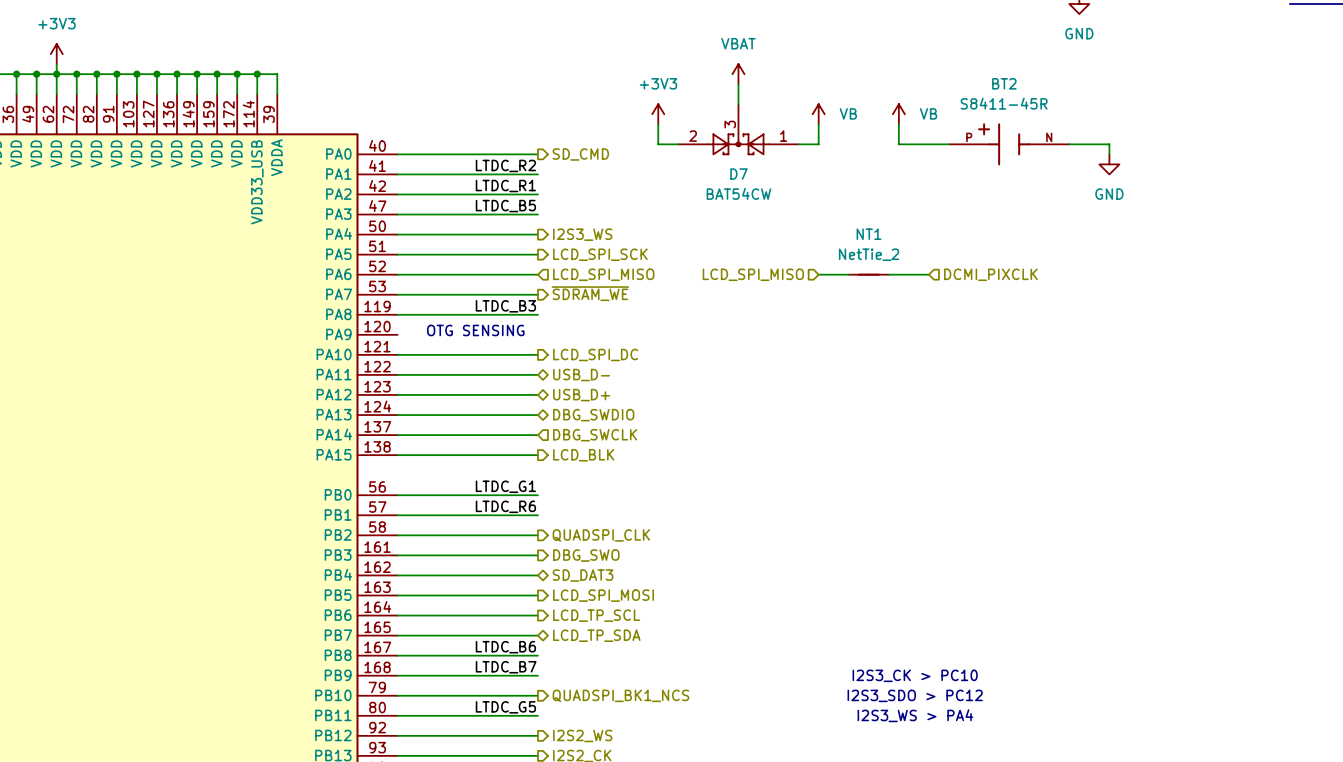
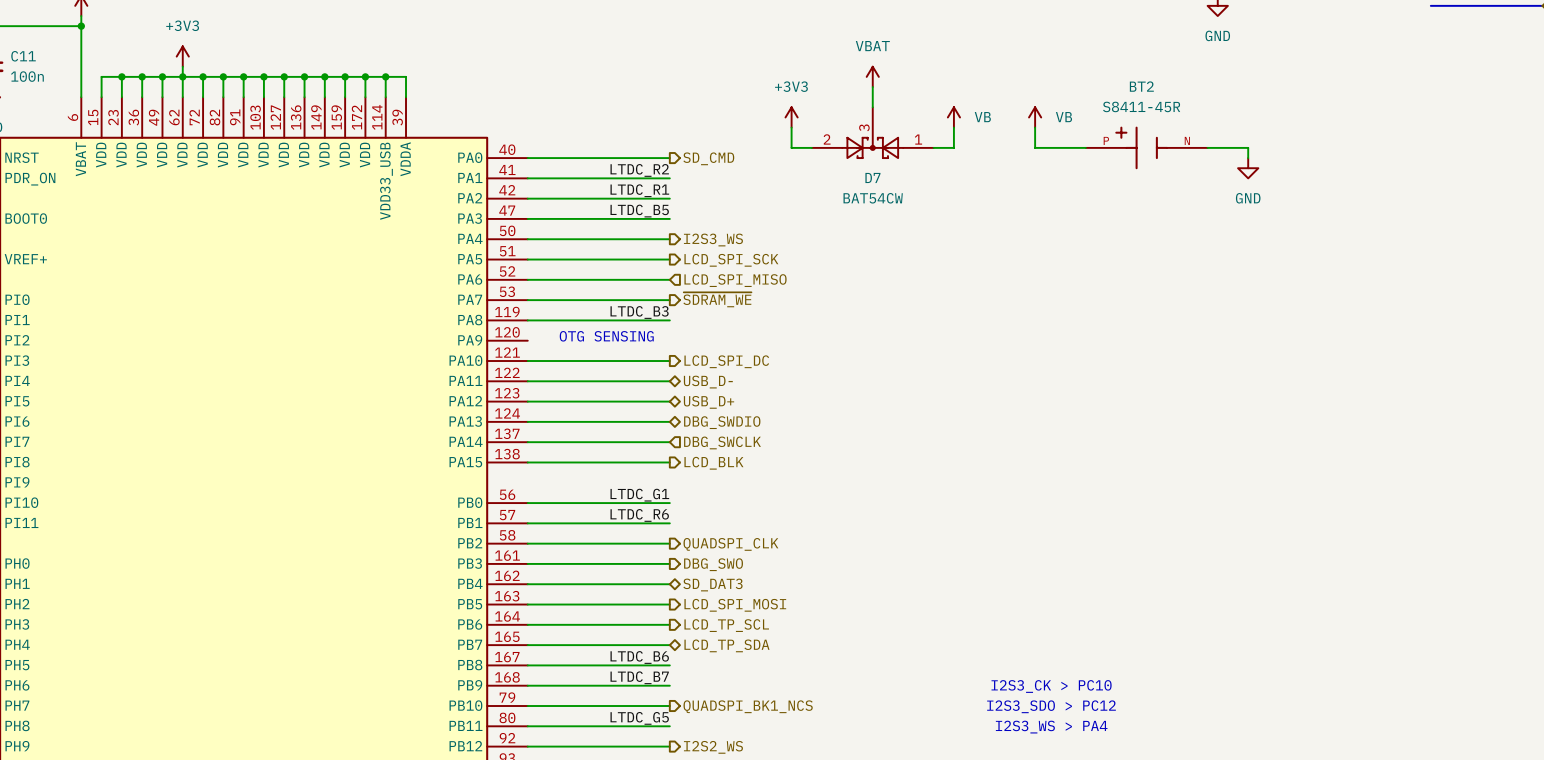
hierarchical label: LCD_SPI_MISO (753, 274) -> none
wire: (818, 274) (848, 274) -> none
NT1: NetTie_2 (868, 274) -> none
wire: (888, 274) (928, 274) -> none
hierarchical label: DCMI_PIXCLK (990, 274) -> none

